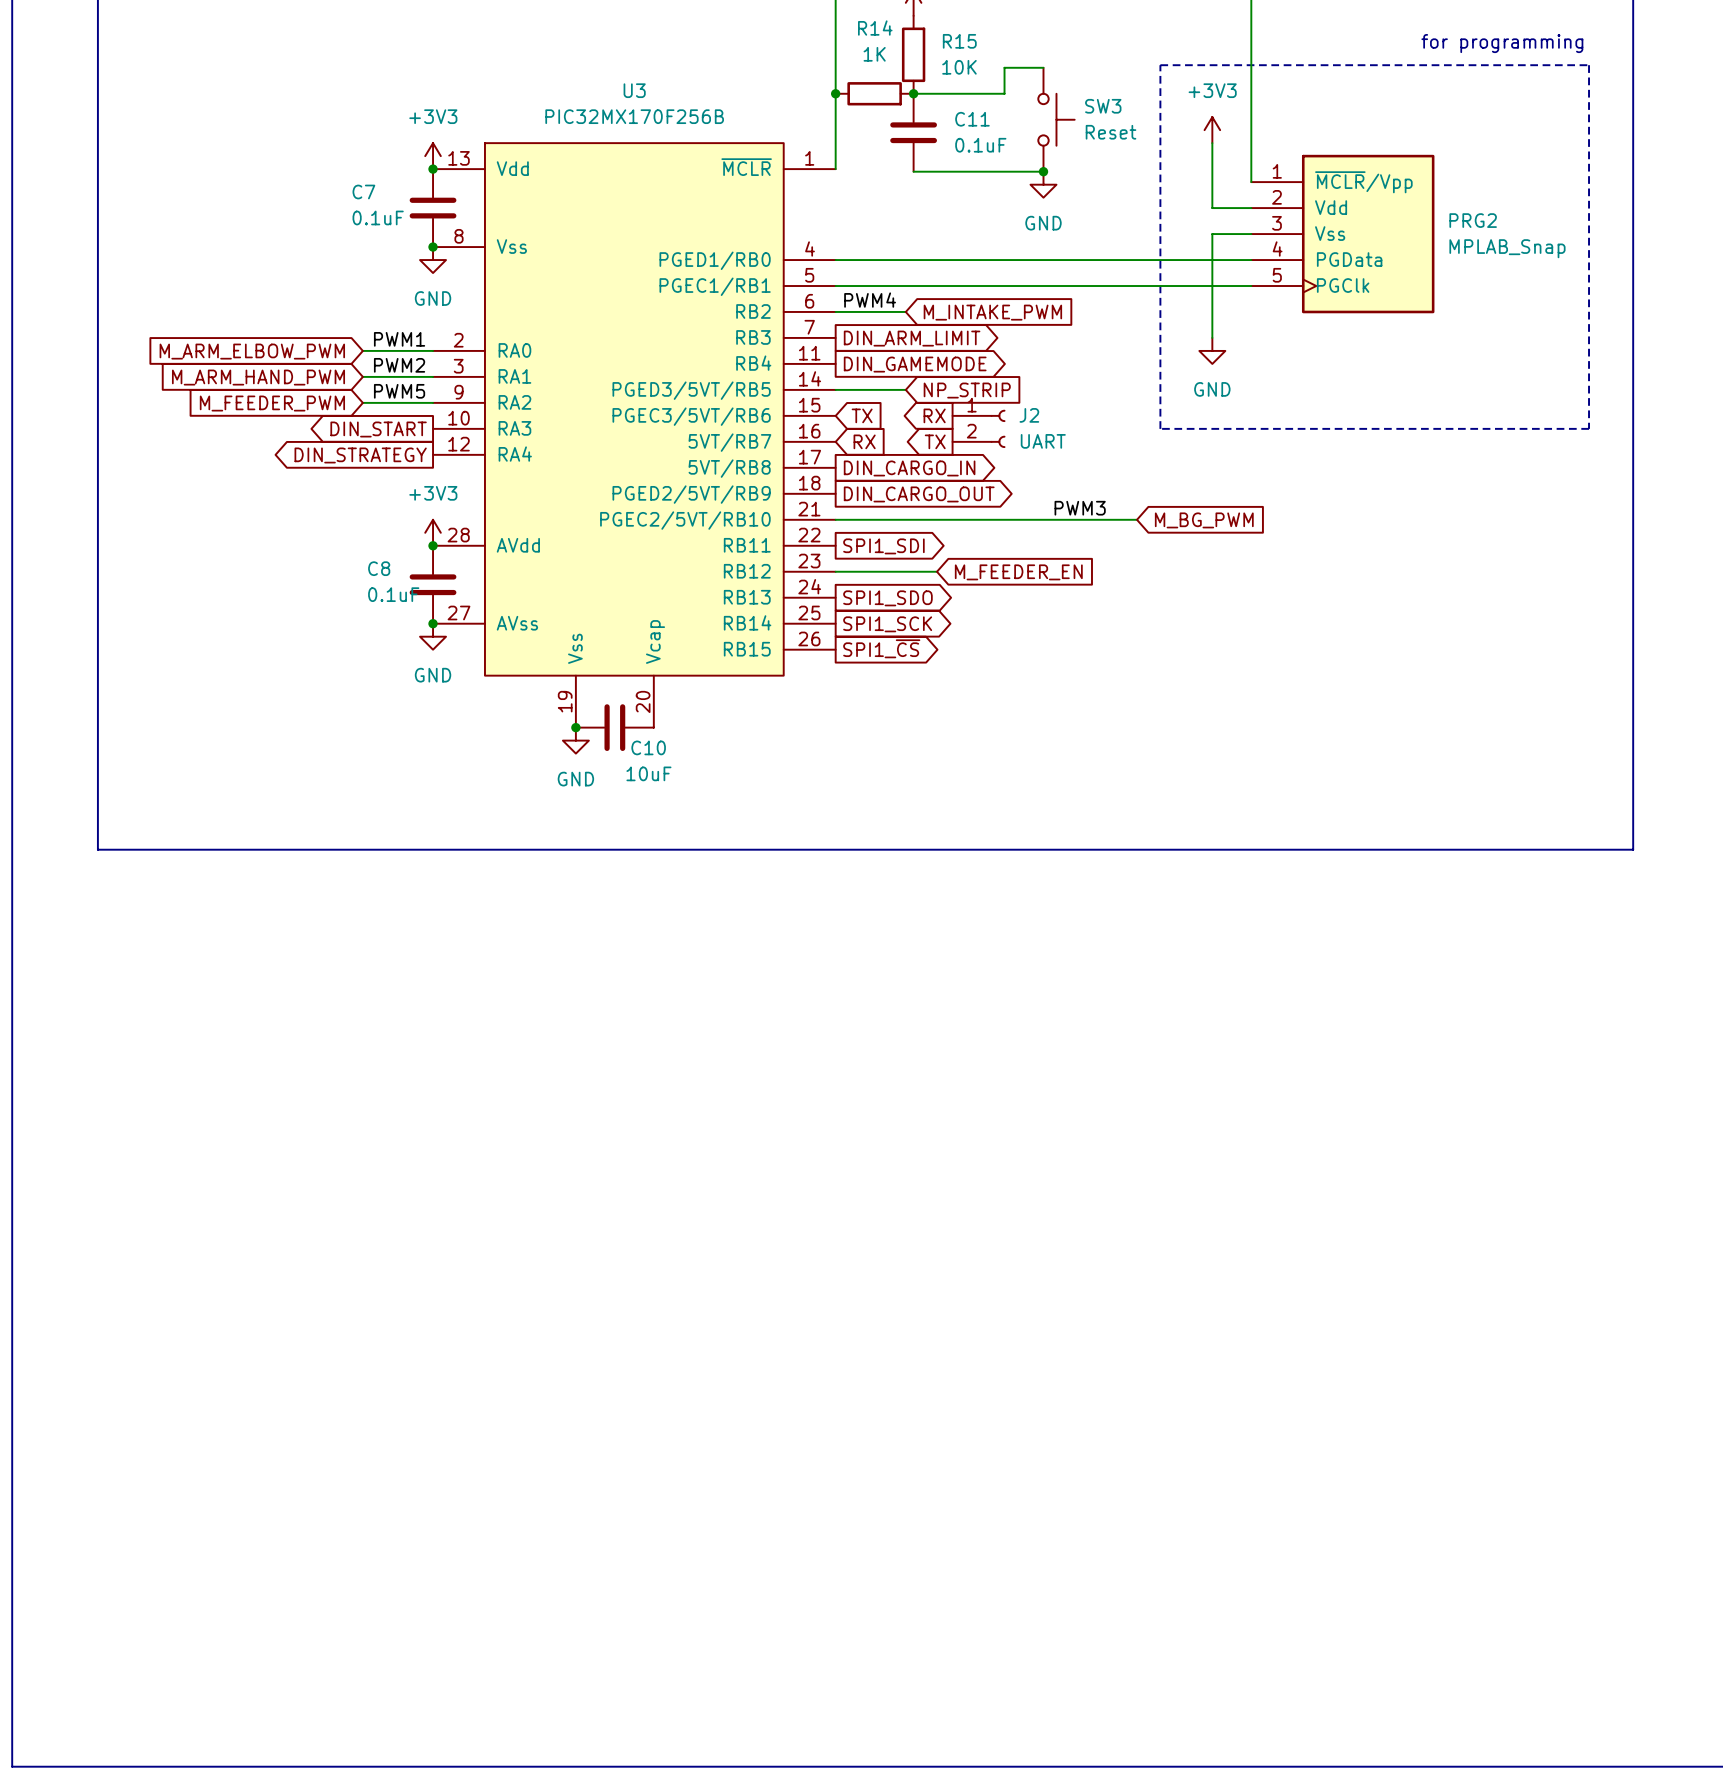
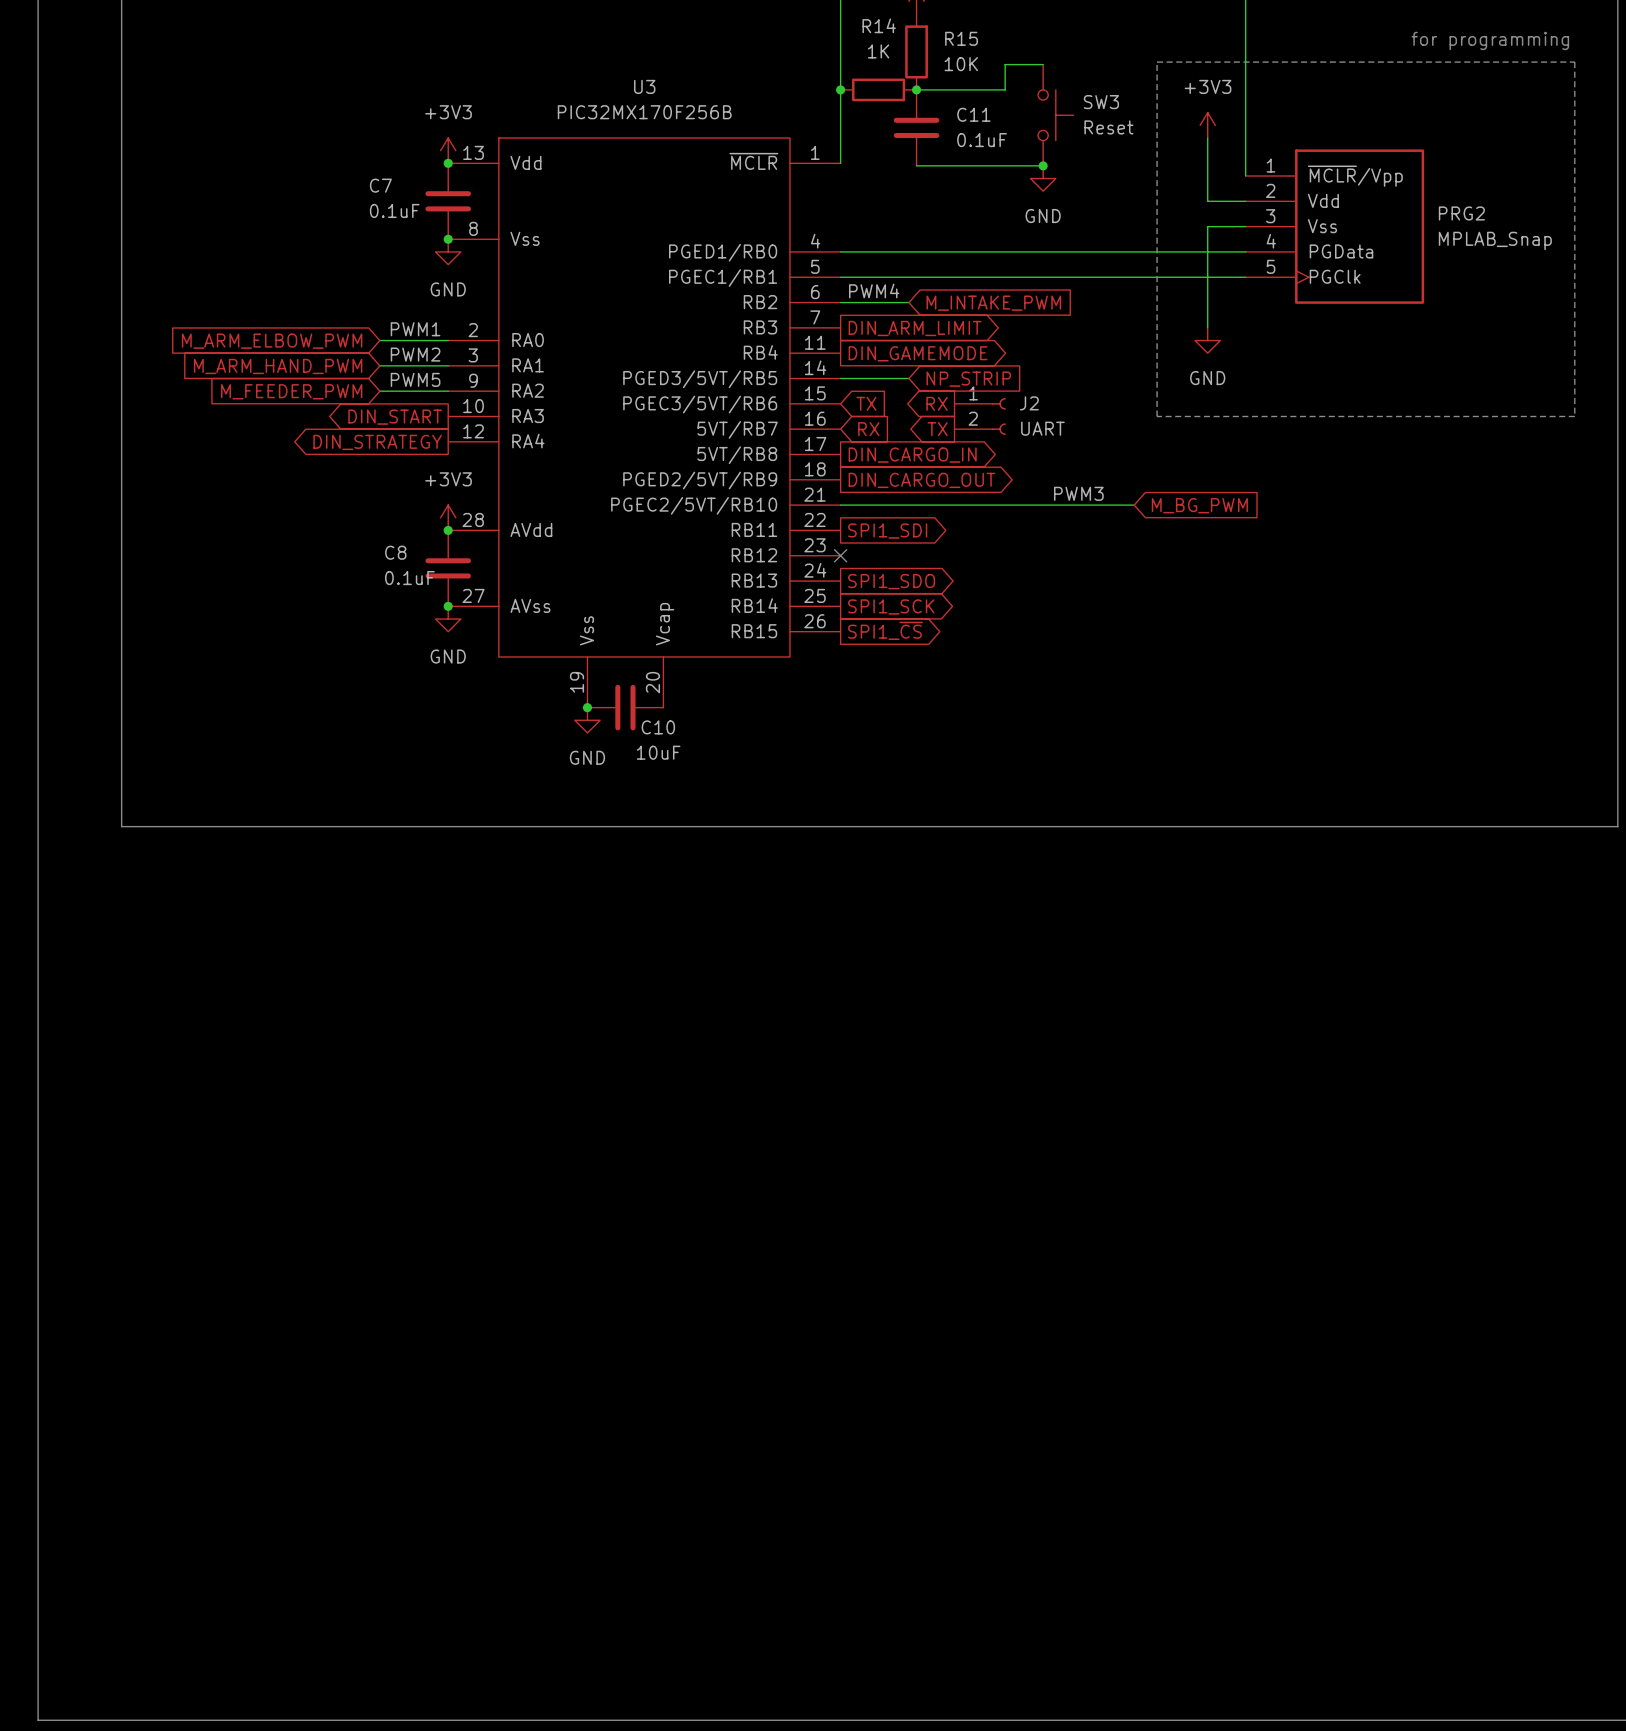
wire: (835, 571) (936, 571) -> none
no-connect mark: none -> (840, 555)
global label: M_FEEDER_EN (1018, 572) -> none

